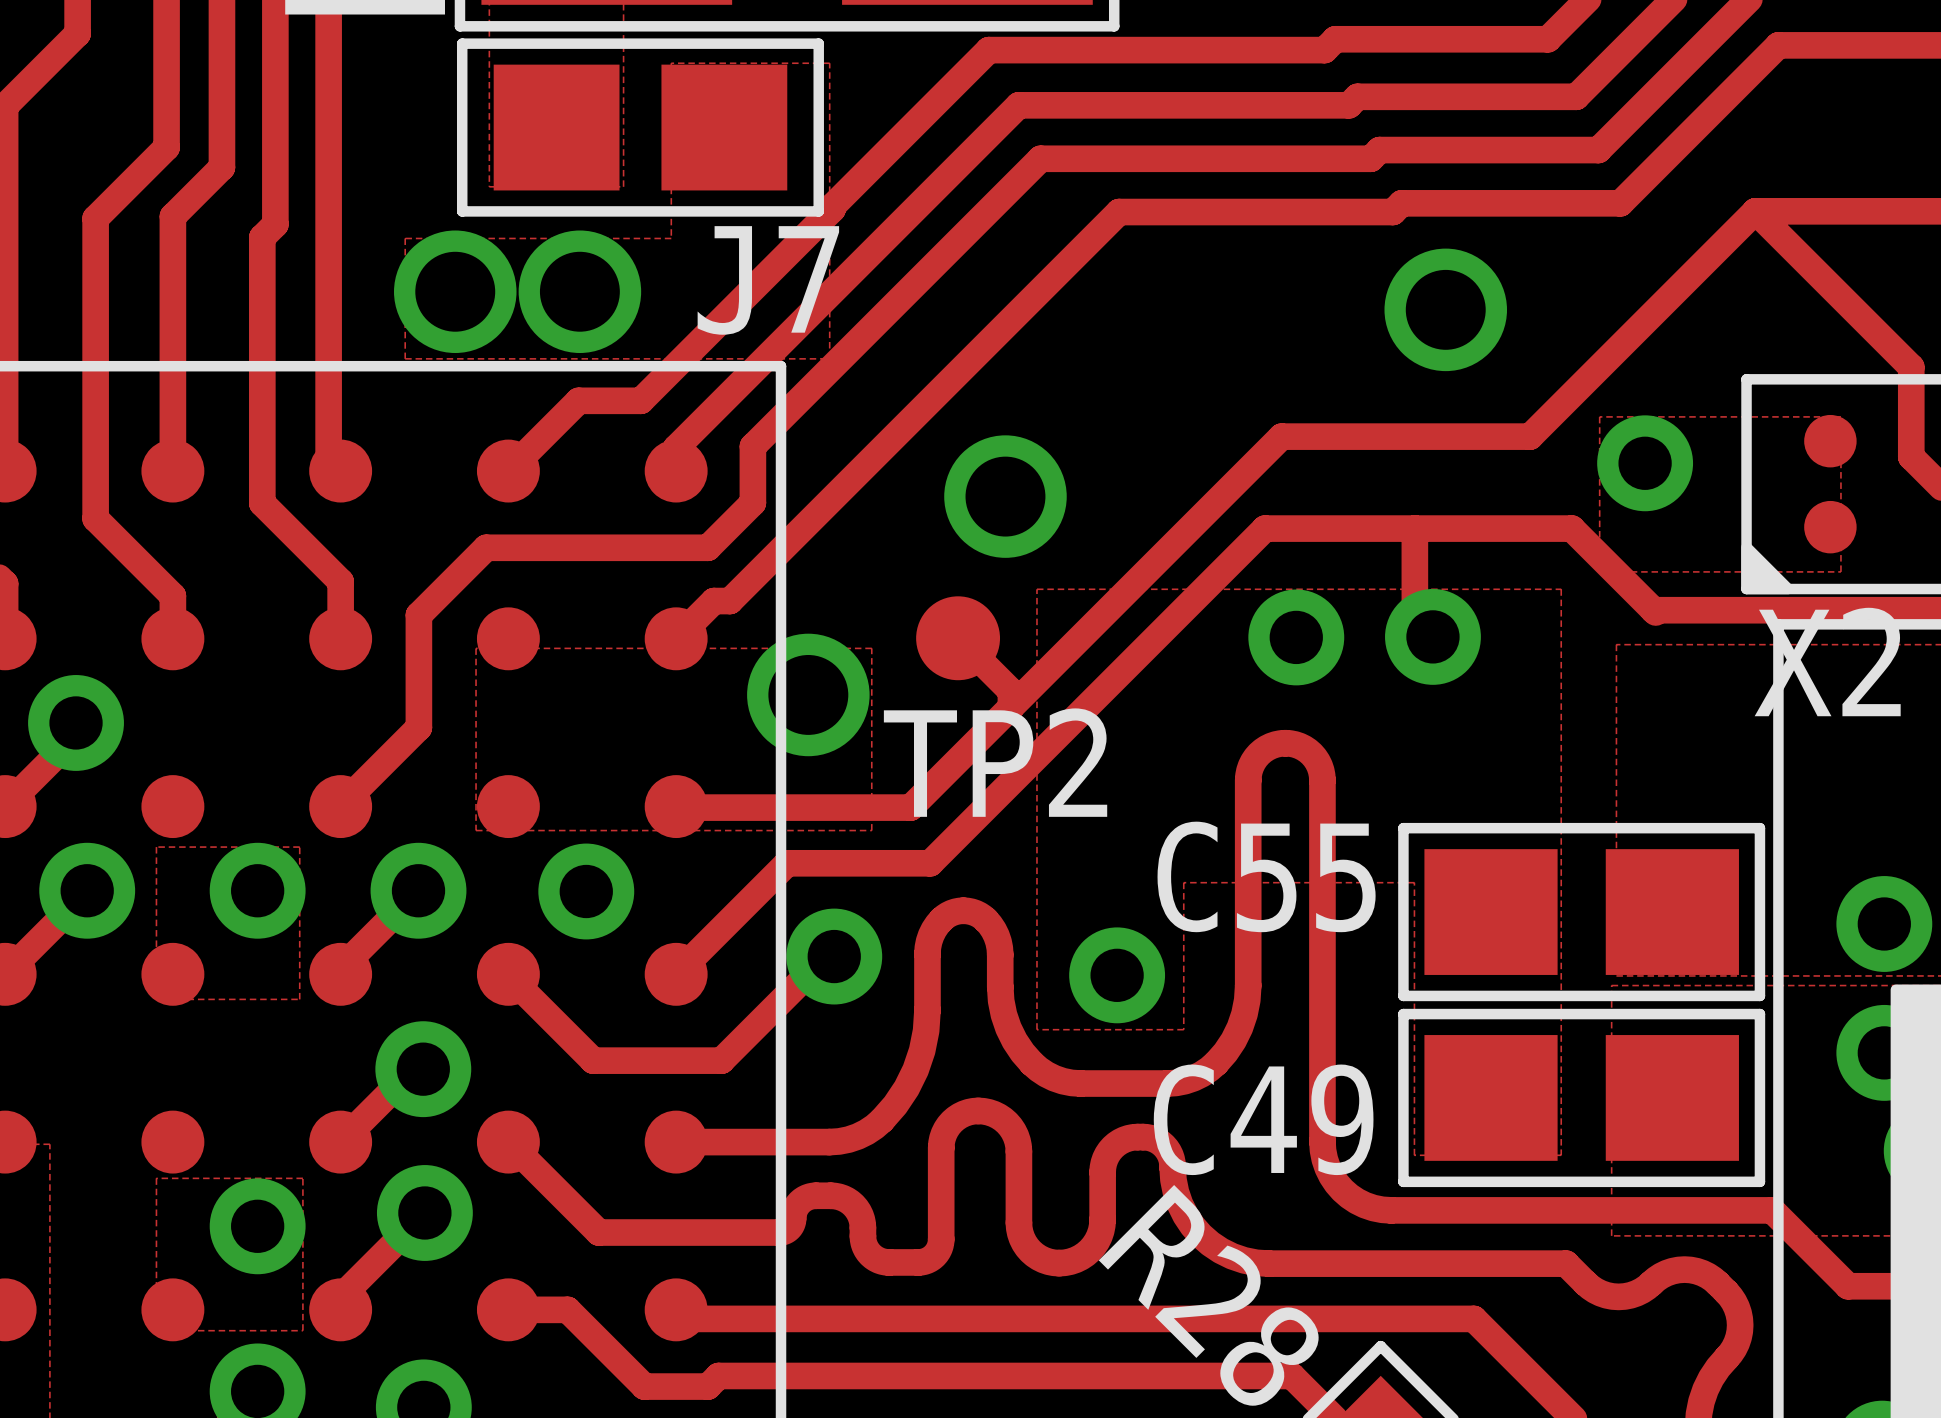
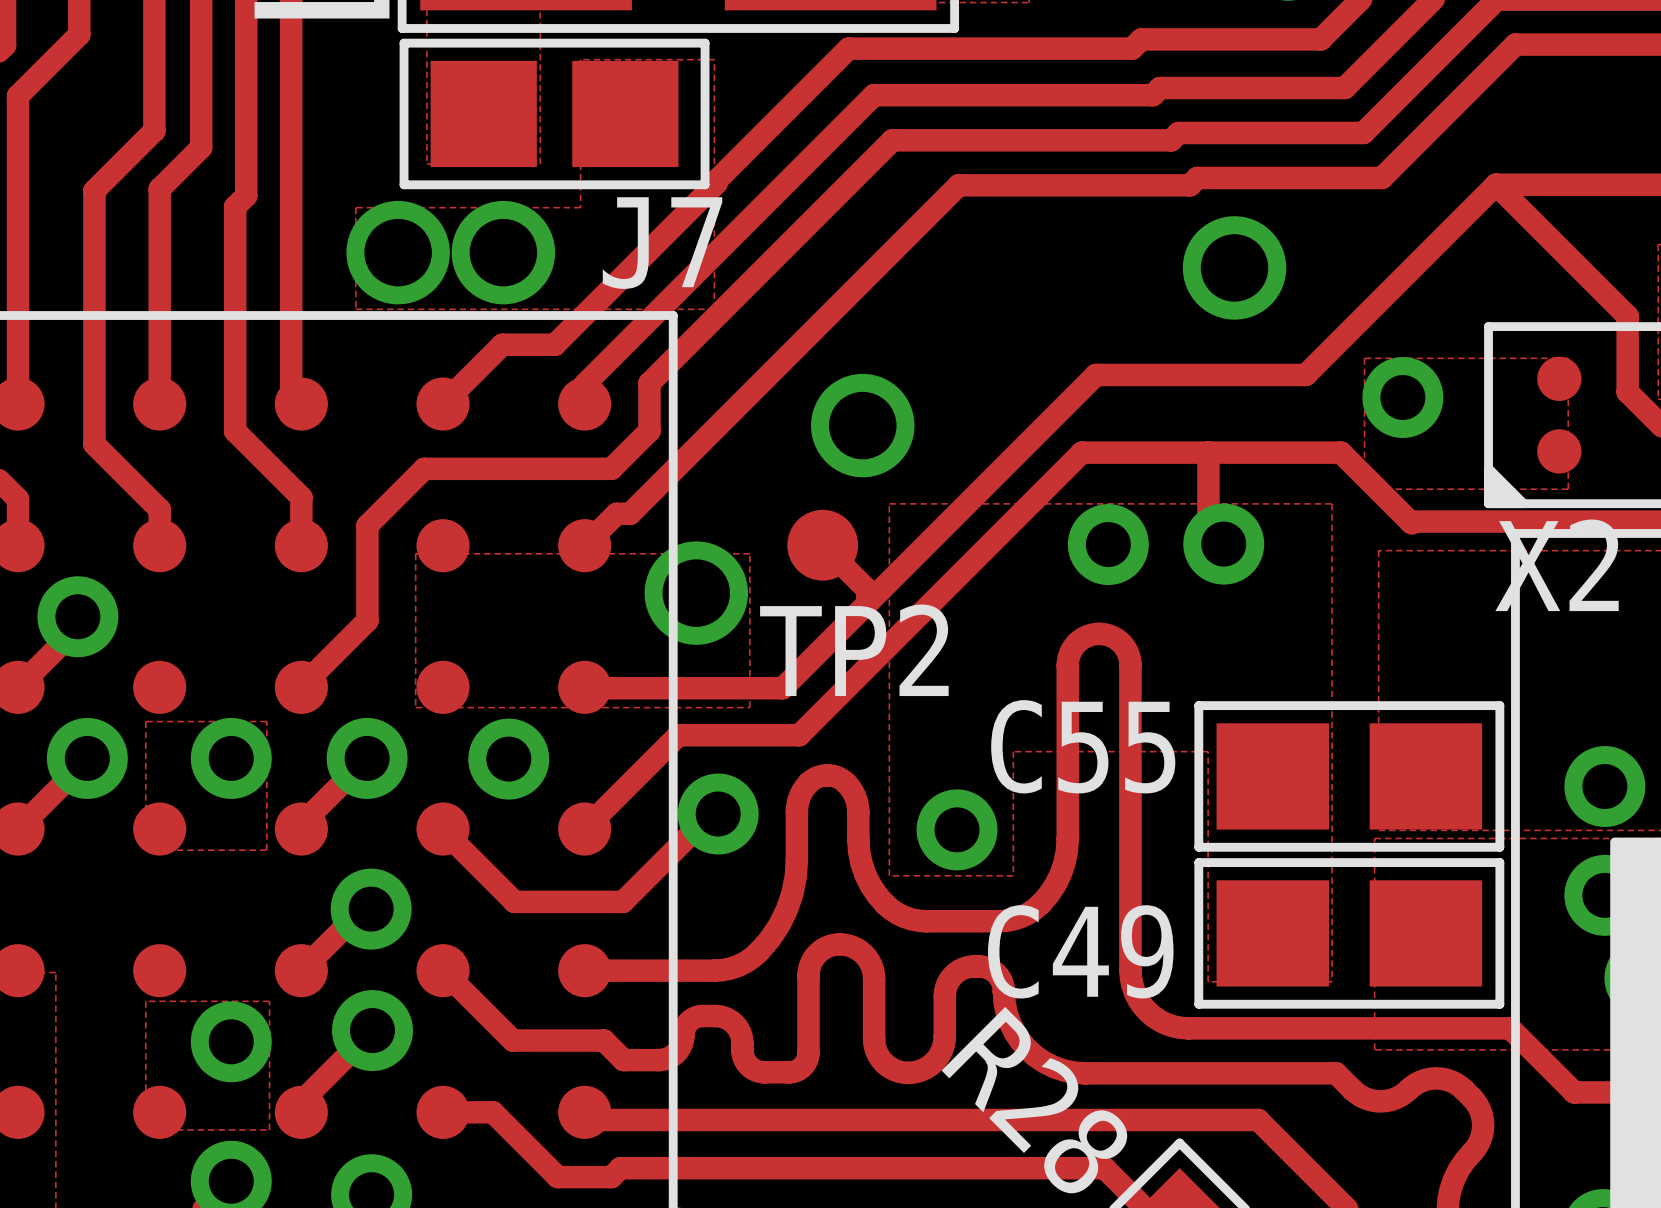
track: (793, 1218) (789, 1228) (779, 1232) (598, 1232) (591, 1224) -> (683, 1035) (681, 1044) (676, 1052) (668, 1058) (658, 1060) (623, 1060) (604, 1040) (512, 1040)

